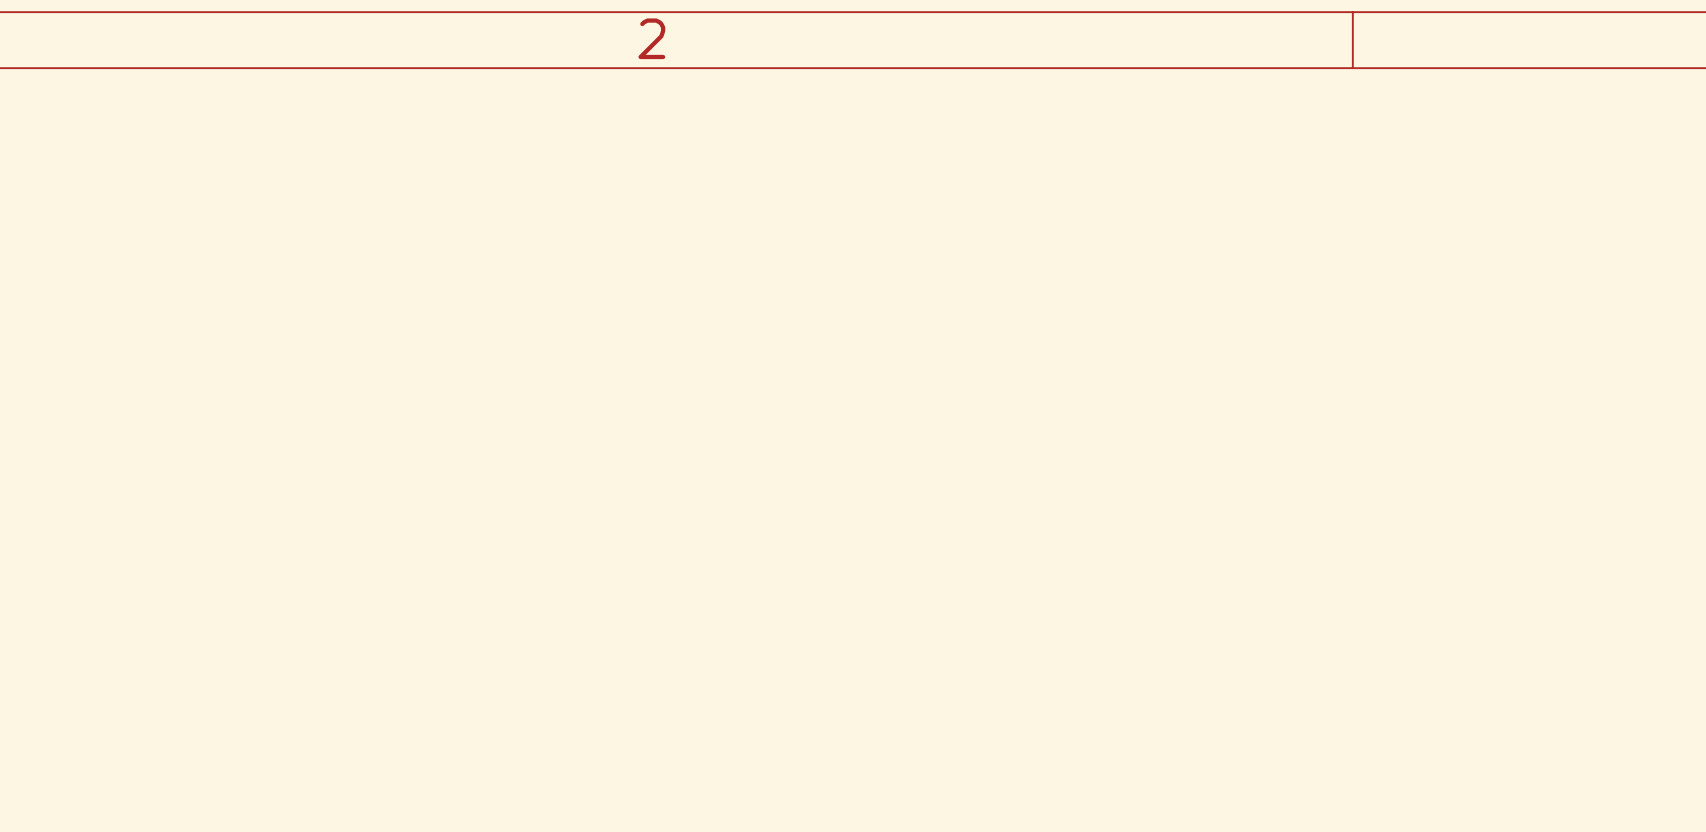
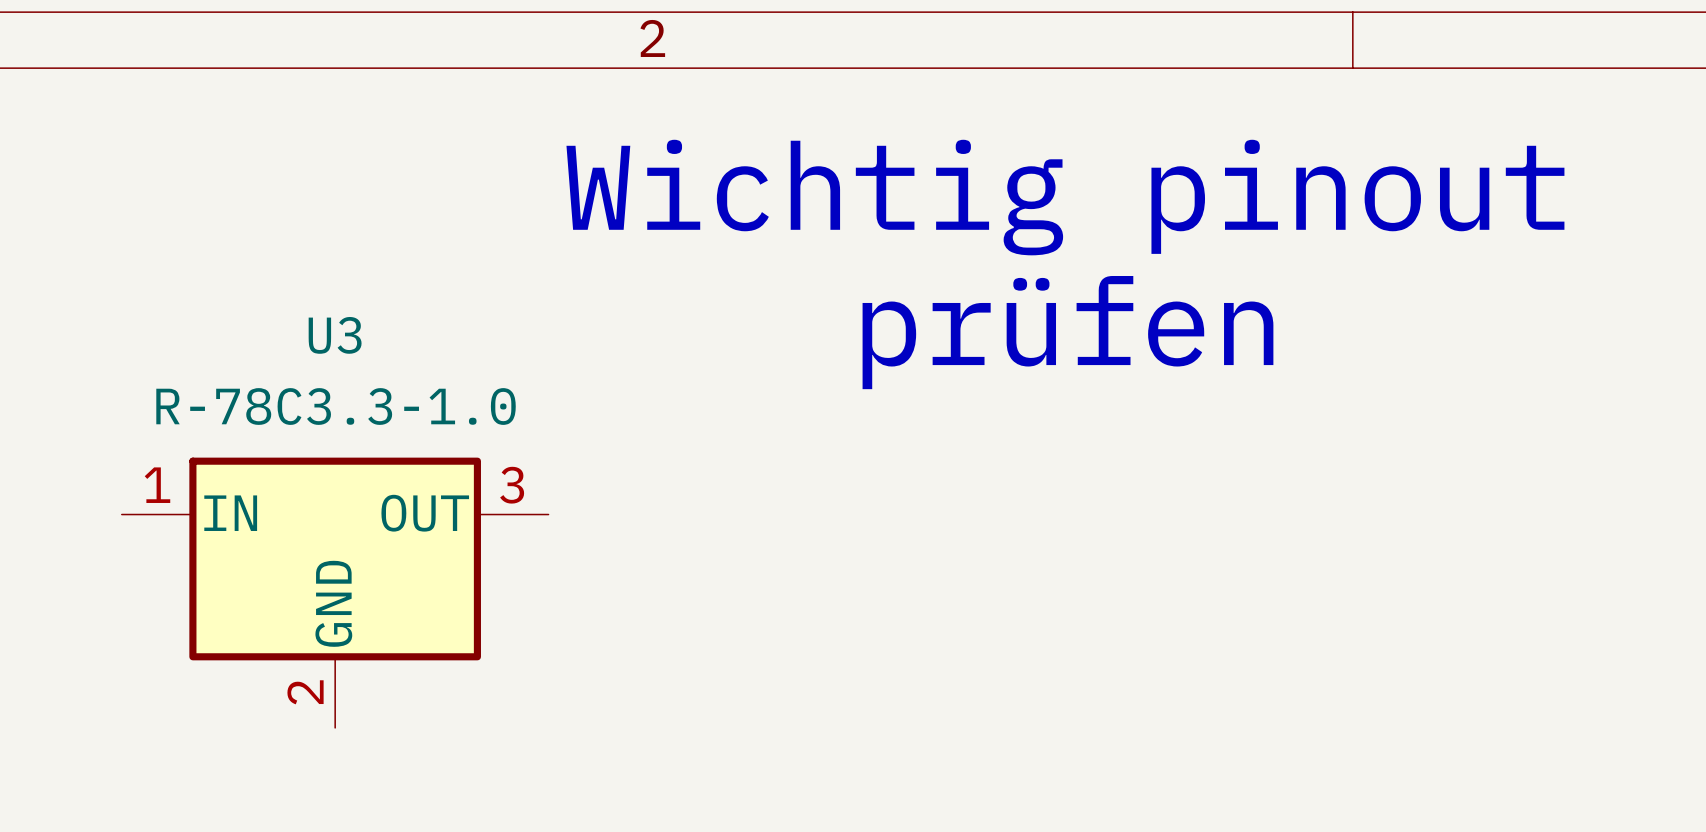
text: none -> Wichtig pinout (1065, 197)
text: none -> prüfen (1067, 332)
U3: none -> R-78C3.3-1.0 (335, 592)

